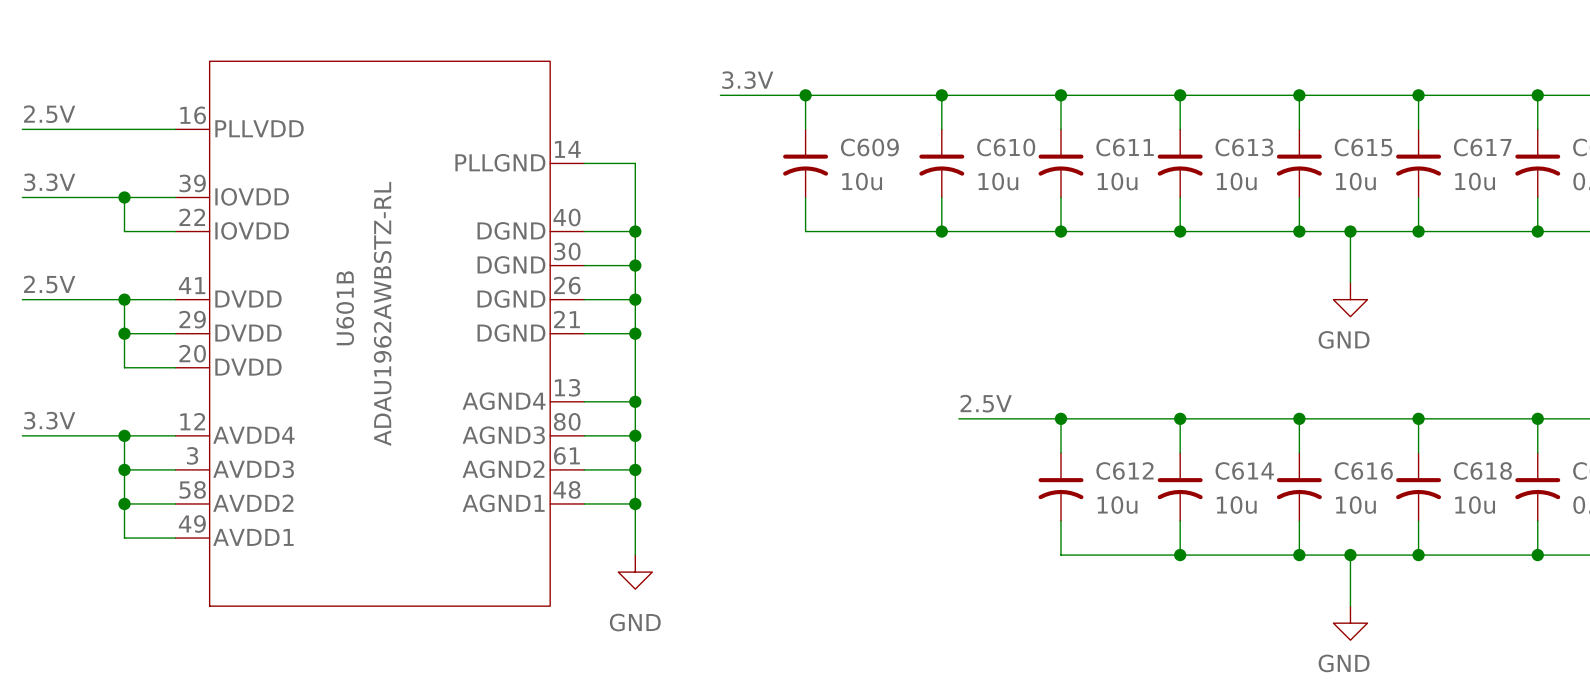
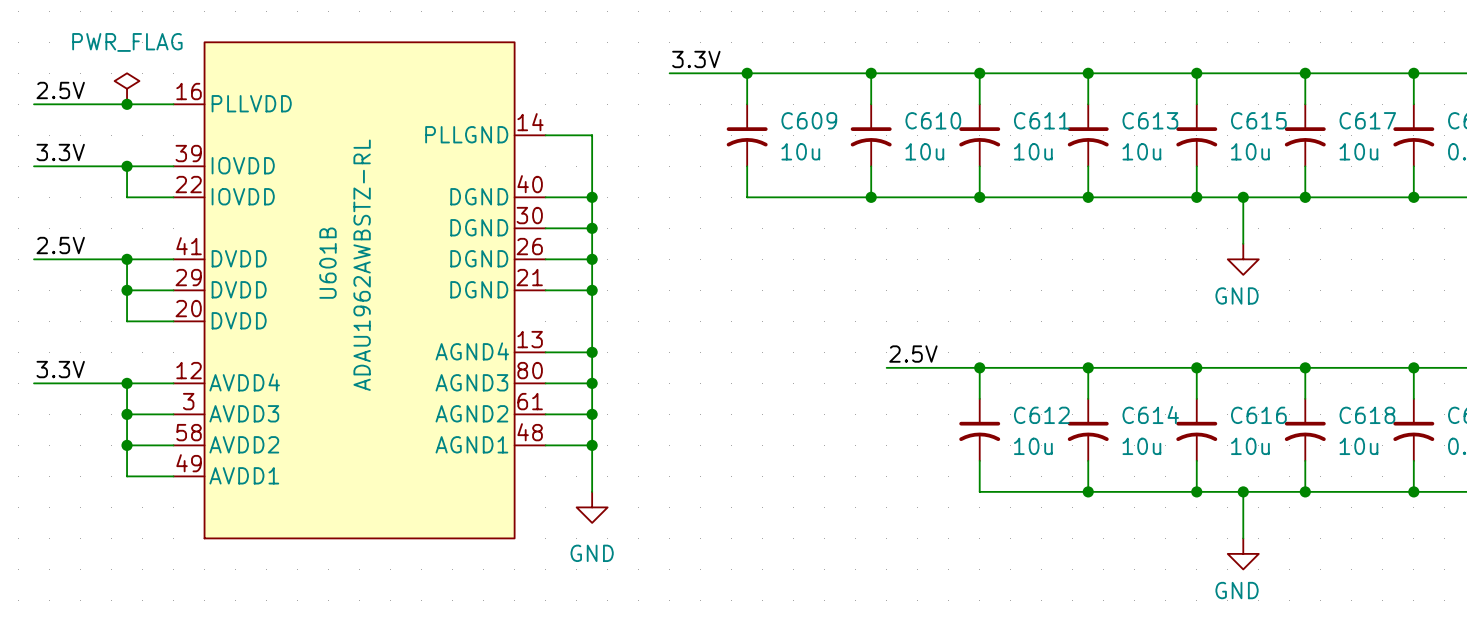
power symbol: none -> PWR_FLAG (127, 88)
junction: none -> (127, 104)

